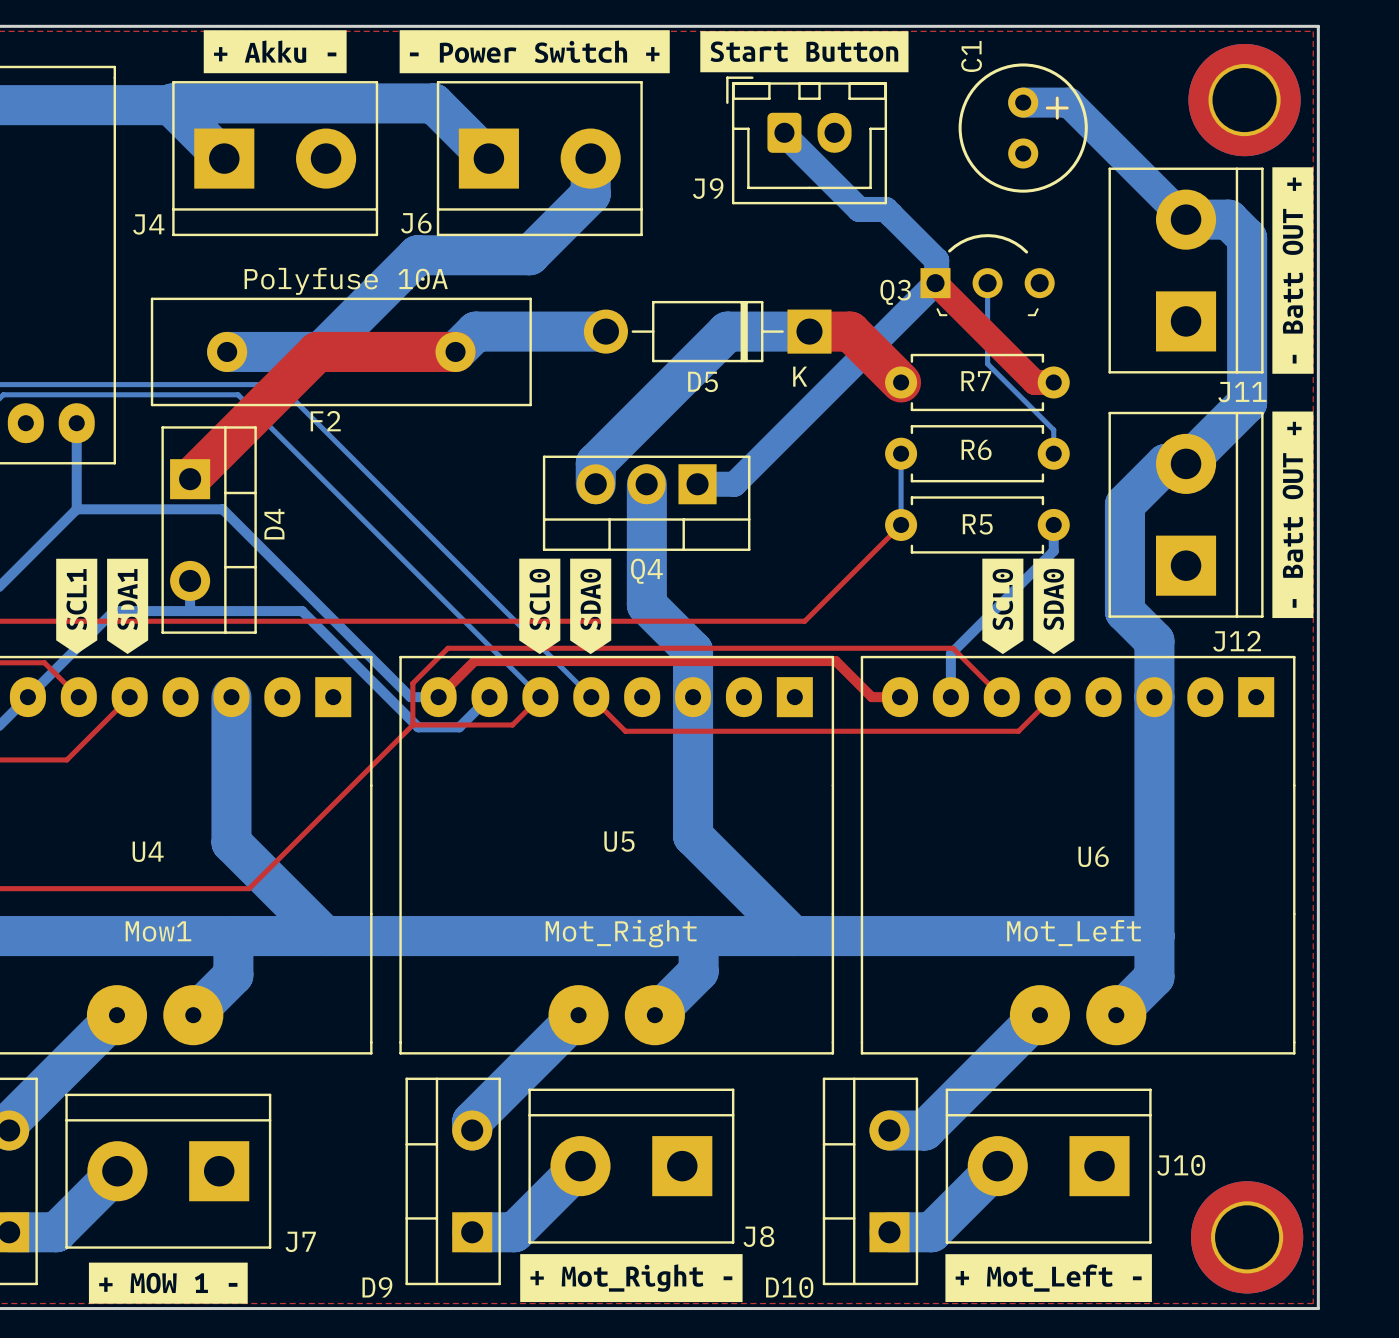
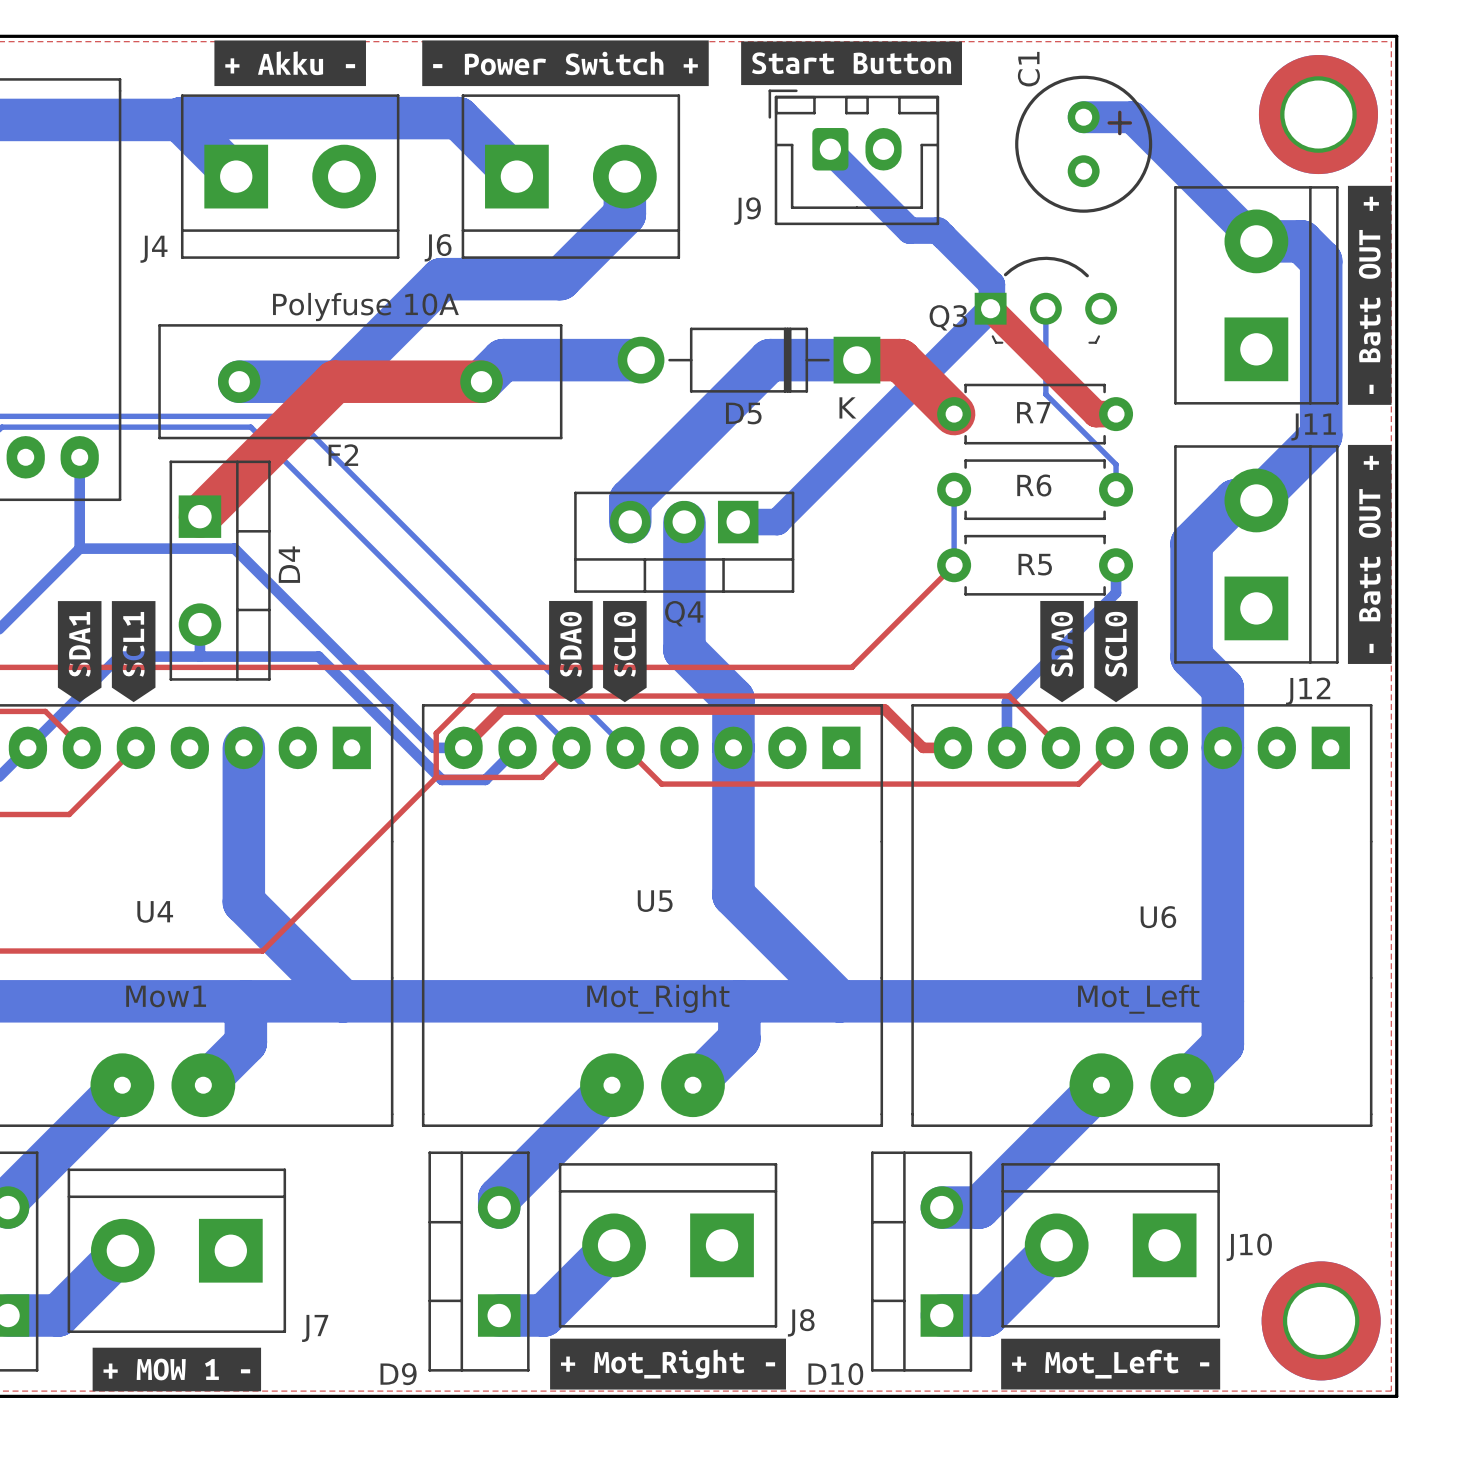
drawing position: (76, 606) -> (133, 651)
drawing position: (127, 606) -> (79, 651)
drawing position: (539, 606) -> (624, 651)
drawing position: (590, 606) -> (570, 651)
drawing position: (1002, 606) -> (1116, 651)
drawing position: (1053, 606) -> (1062, 651)

